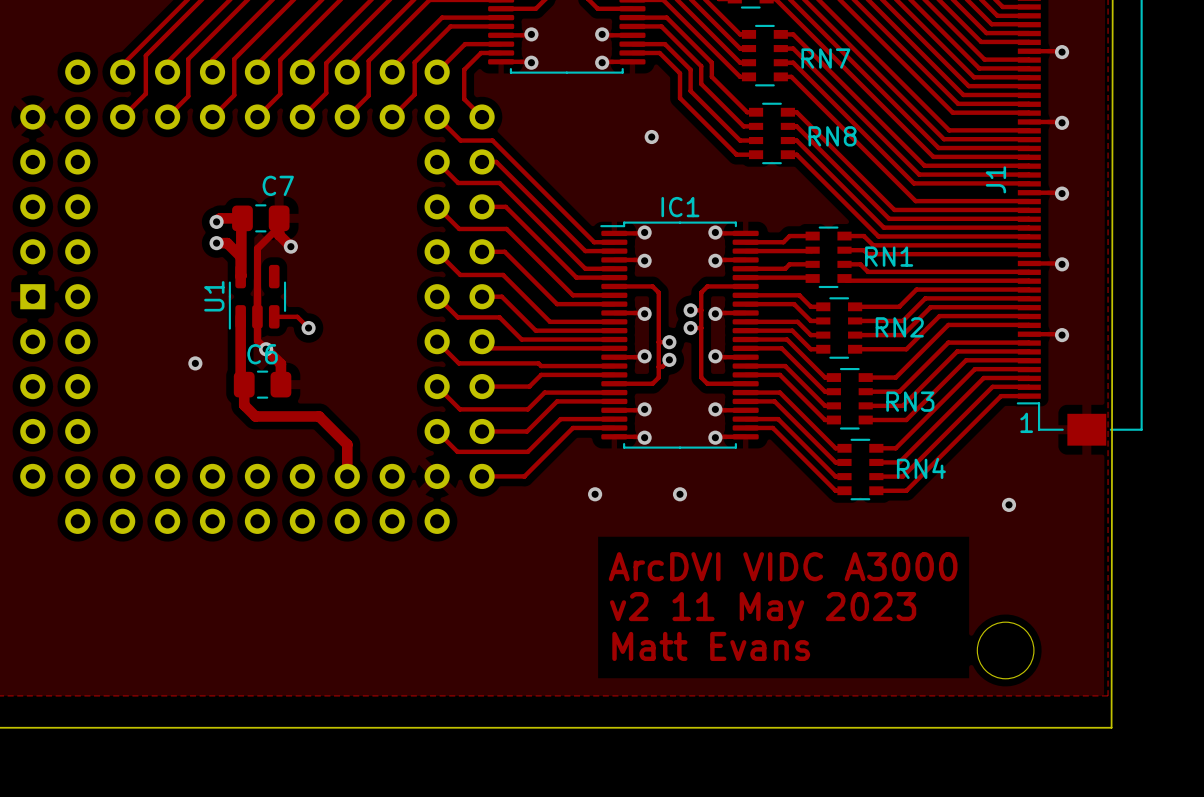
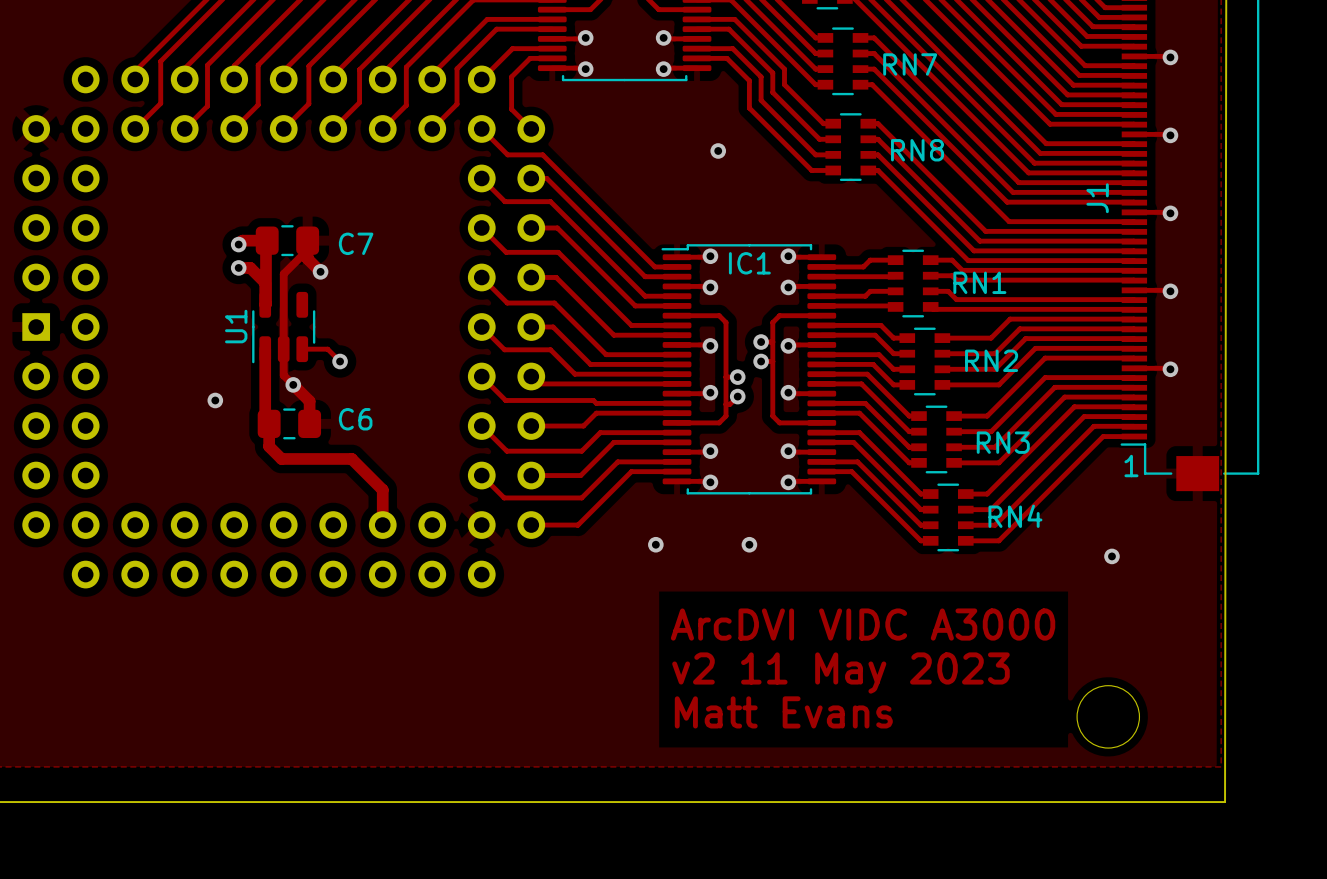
C7 name position: C7 (278, 185) -> C7 (356, 243)
IC1 name position: IC1 (680, 207) -> IC1 (749, 263)
C6 name position: C6 (262, 354) -> C6 (355, 419)

